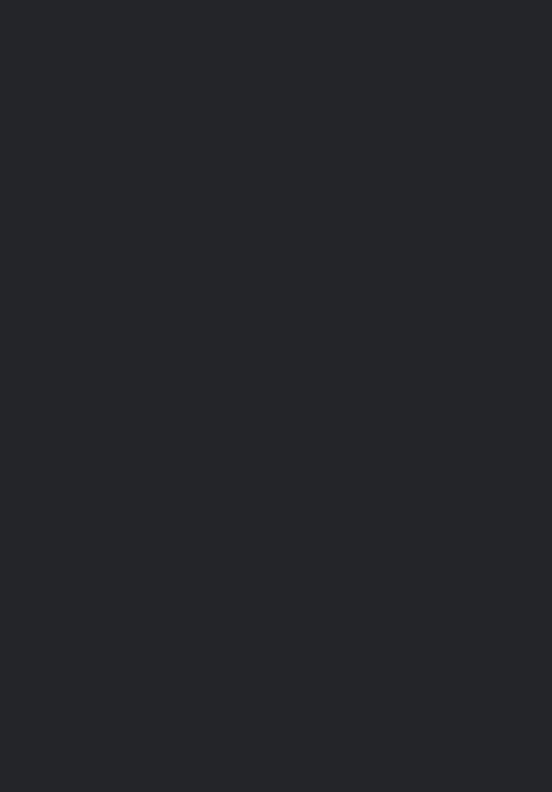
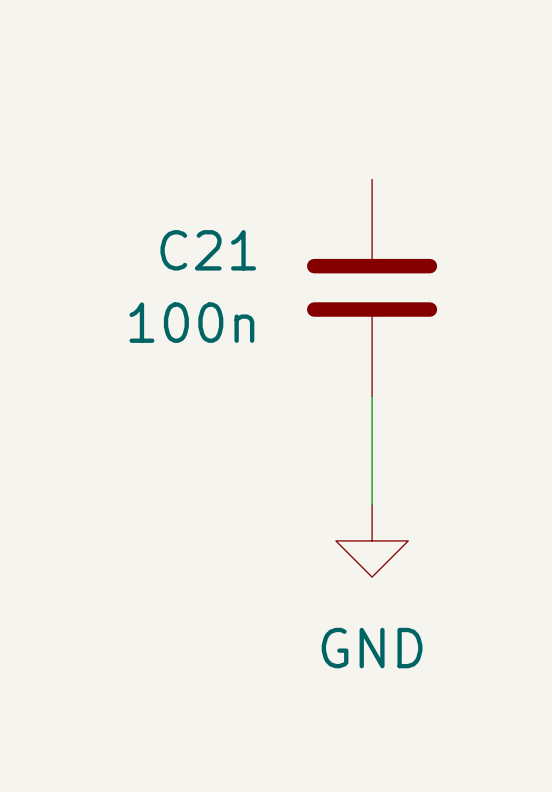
C21: none -> 100n (372, 287)
wire: none -> (372, 396) (372, 504)
power symbol: none -> GND (372, 540)

